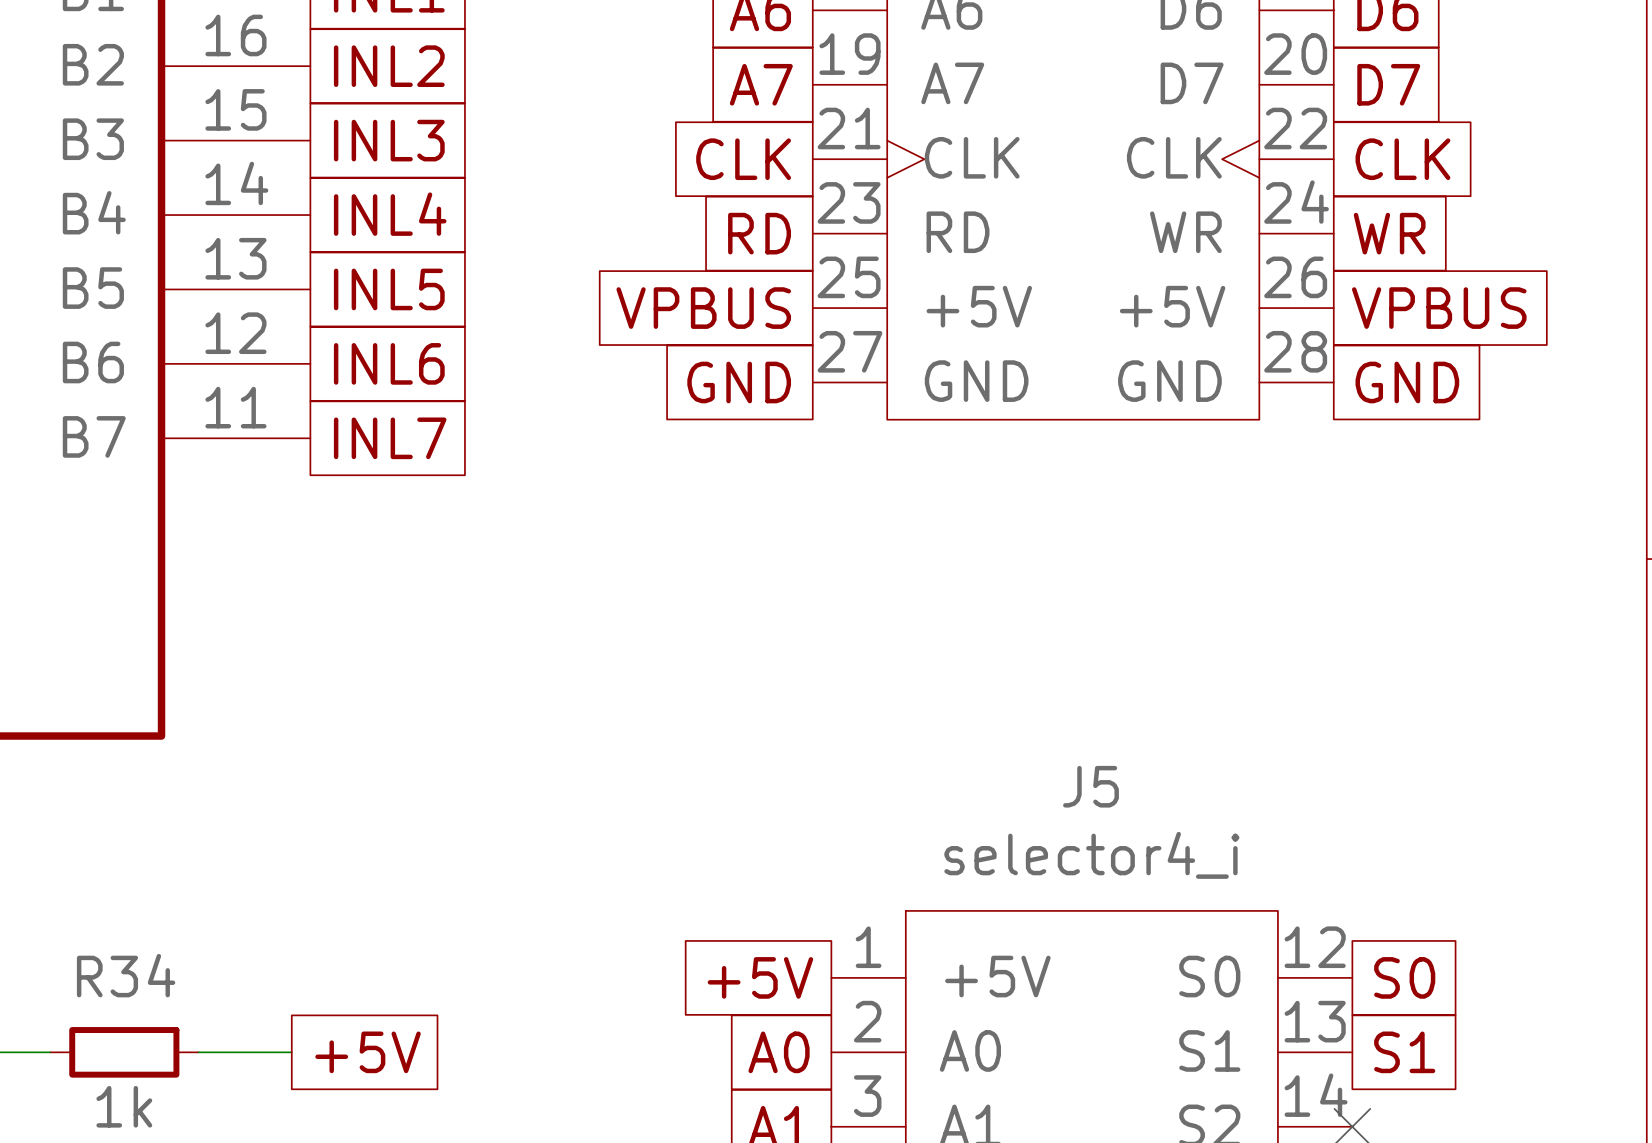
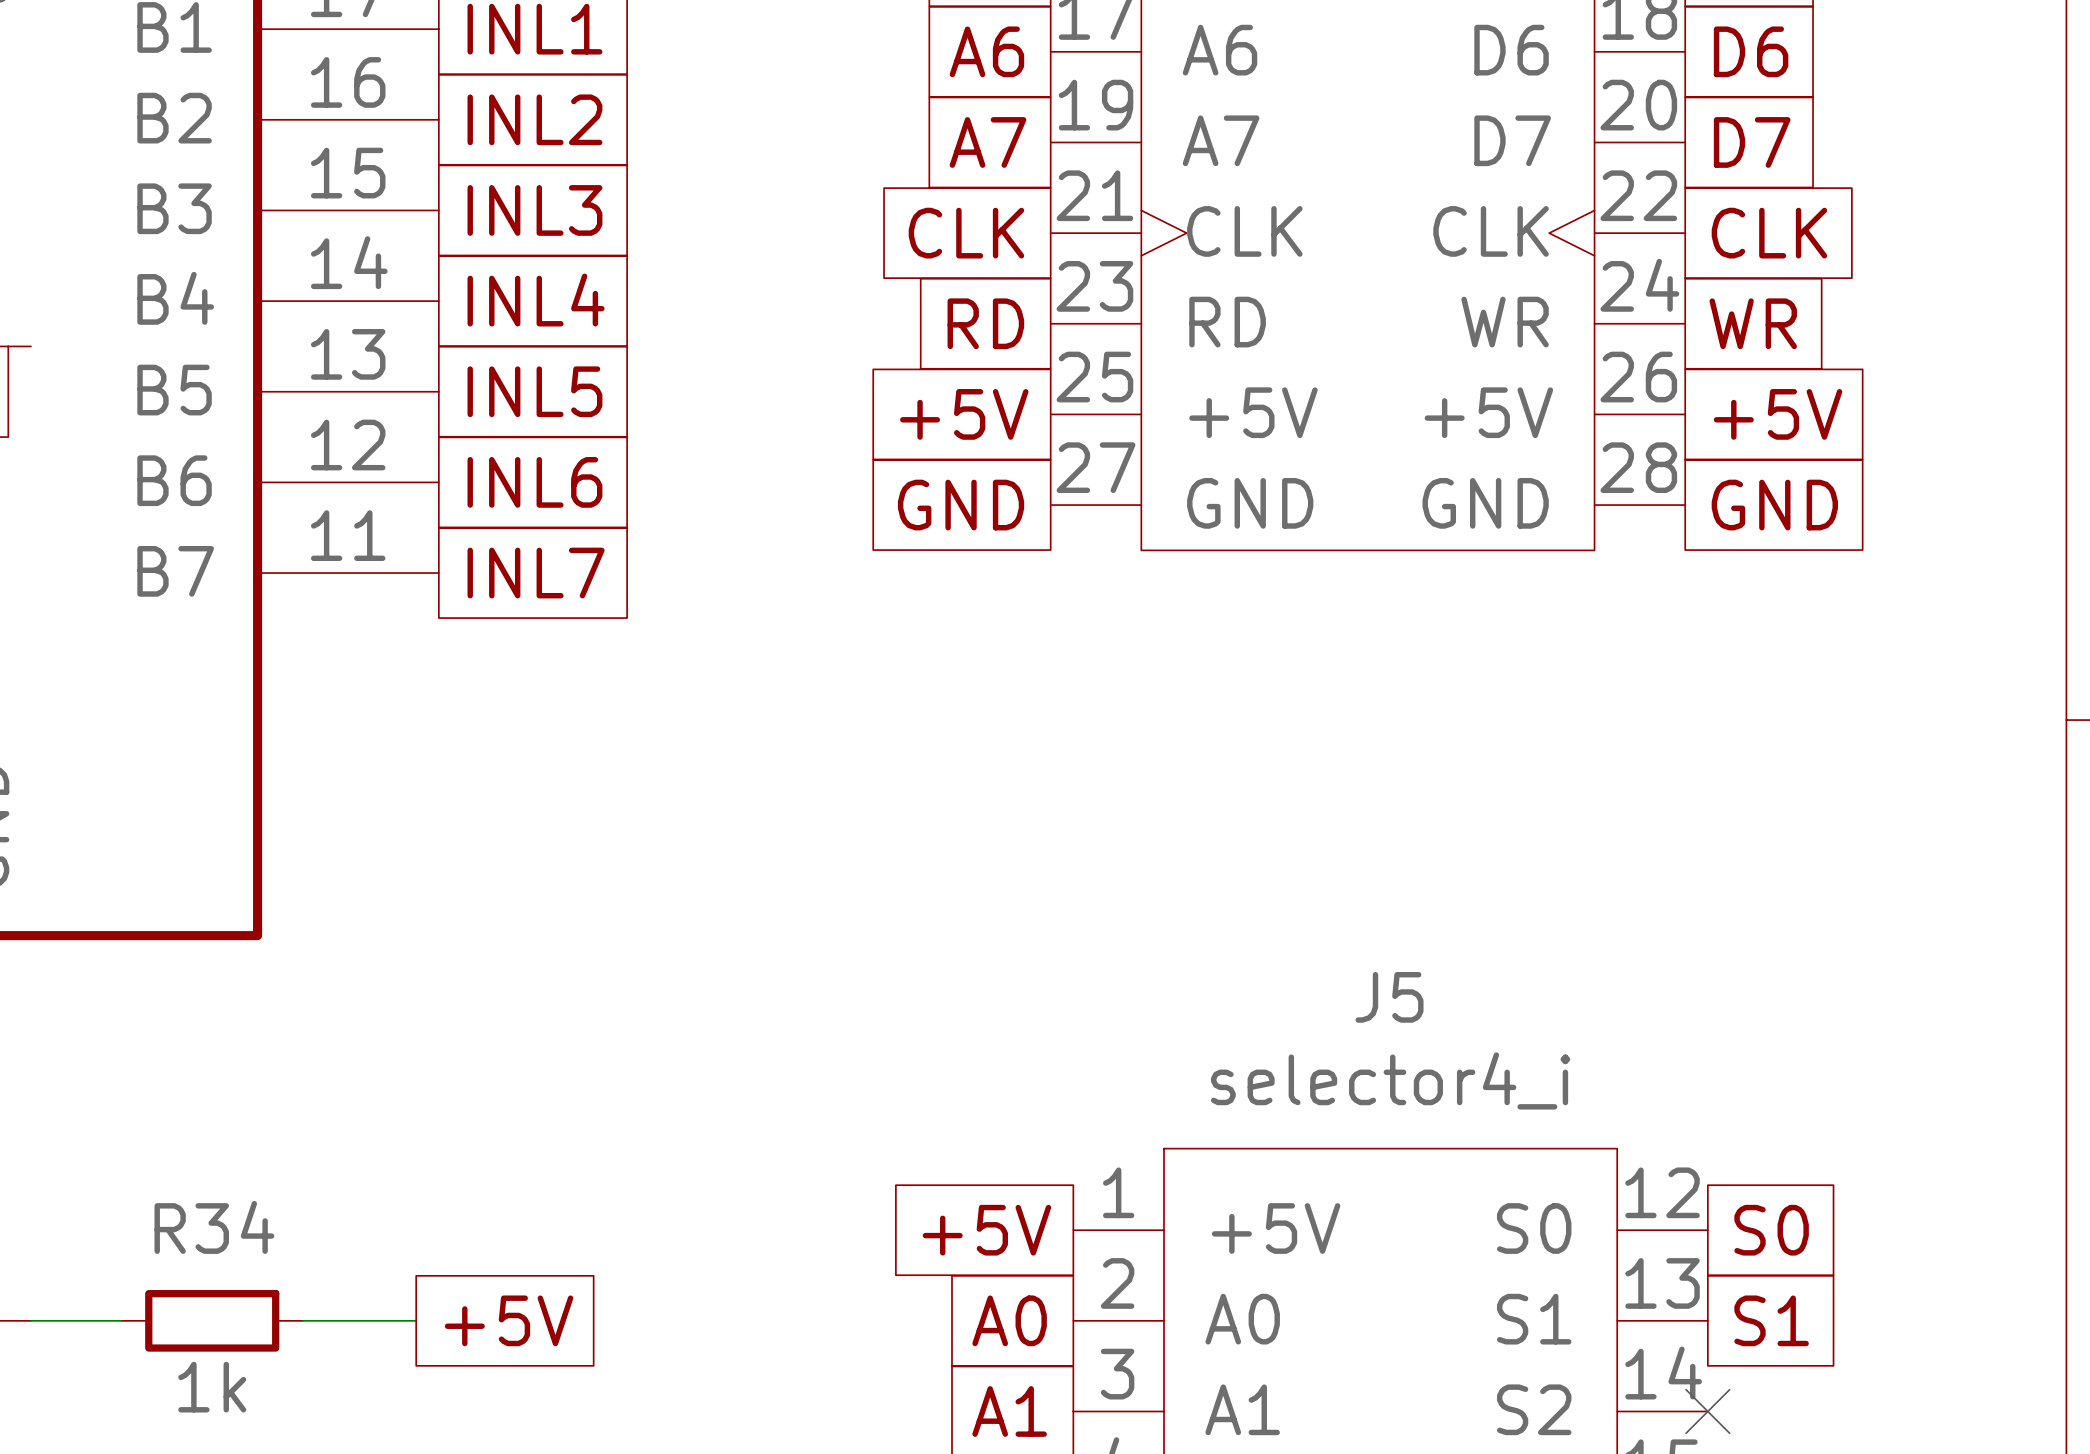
global label: VPBUS (703, 308) -> +5V (964, 414)
global label: VPBUS (1439, 308) -> +5V (1778, 414)

